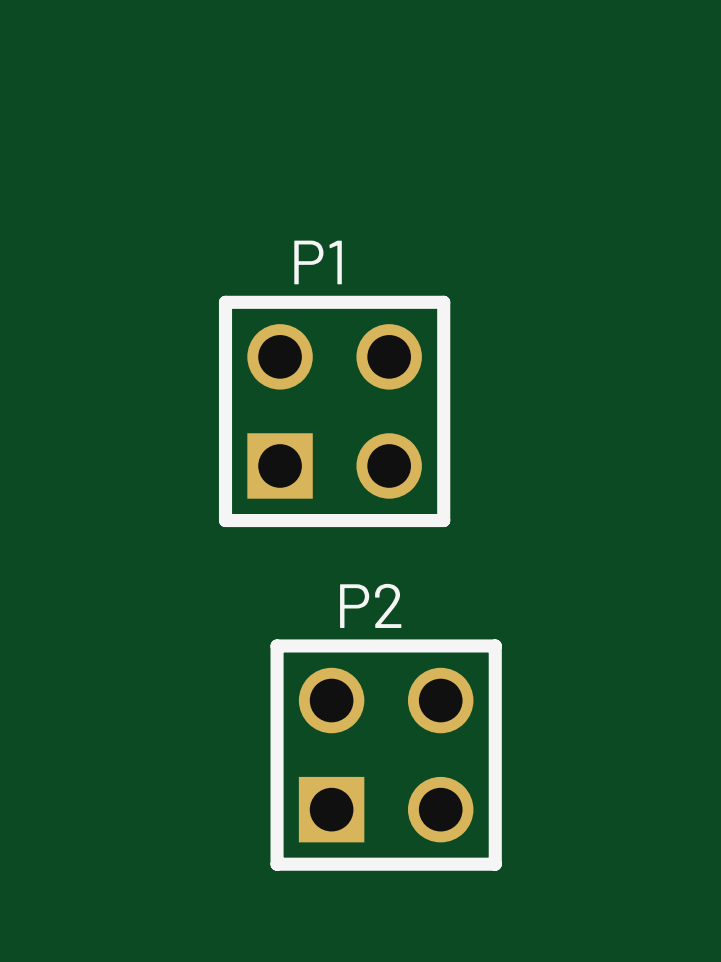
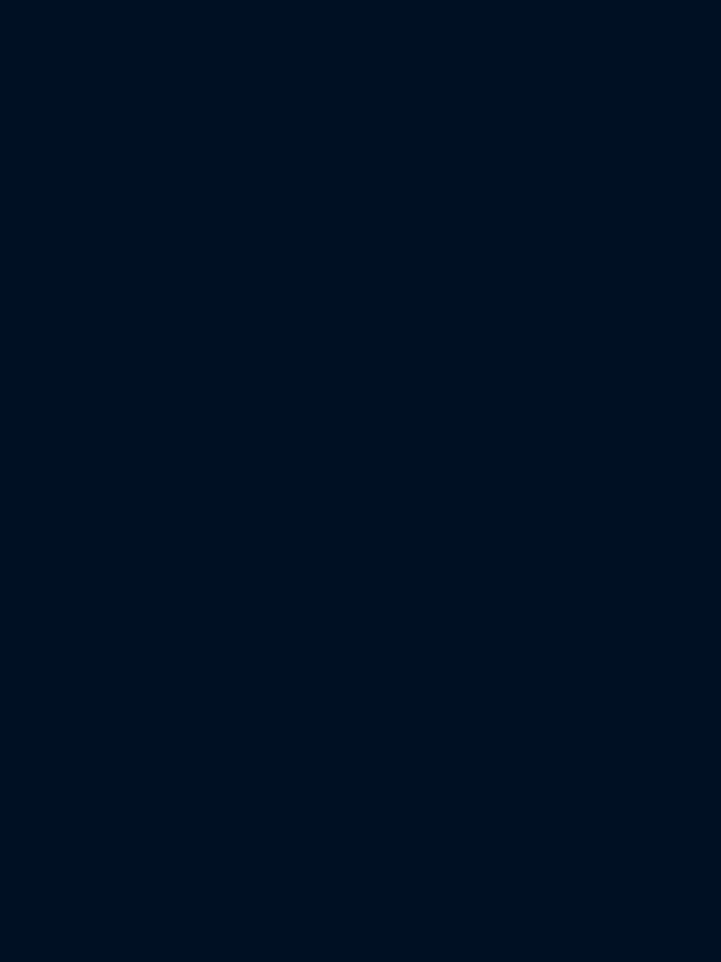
P1: (334, 411) -> none
P2: (386, 755) -> none

